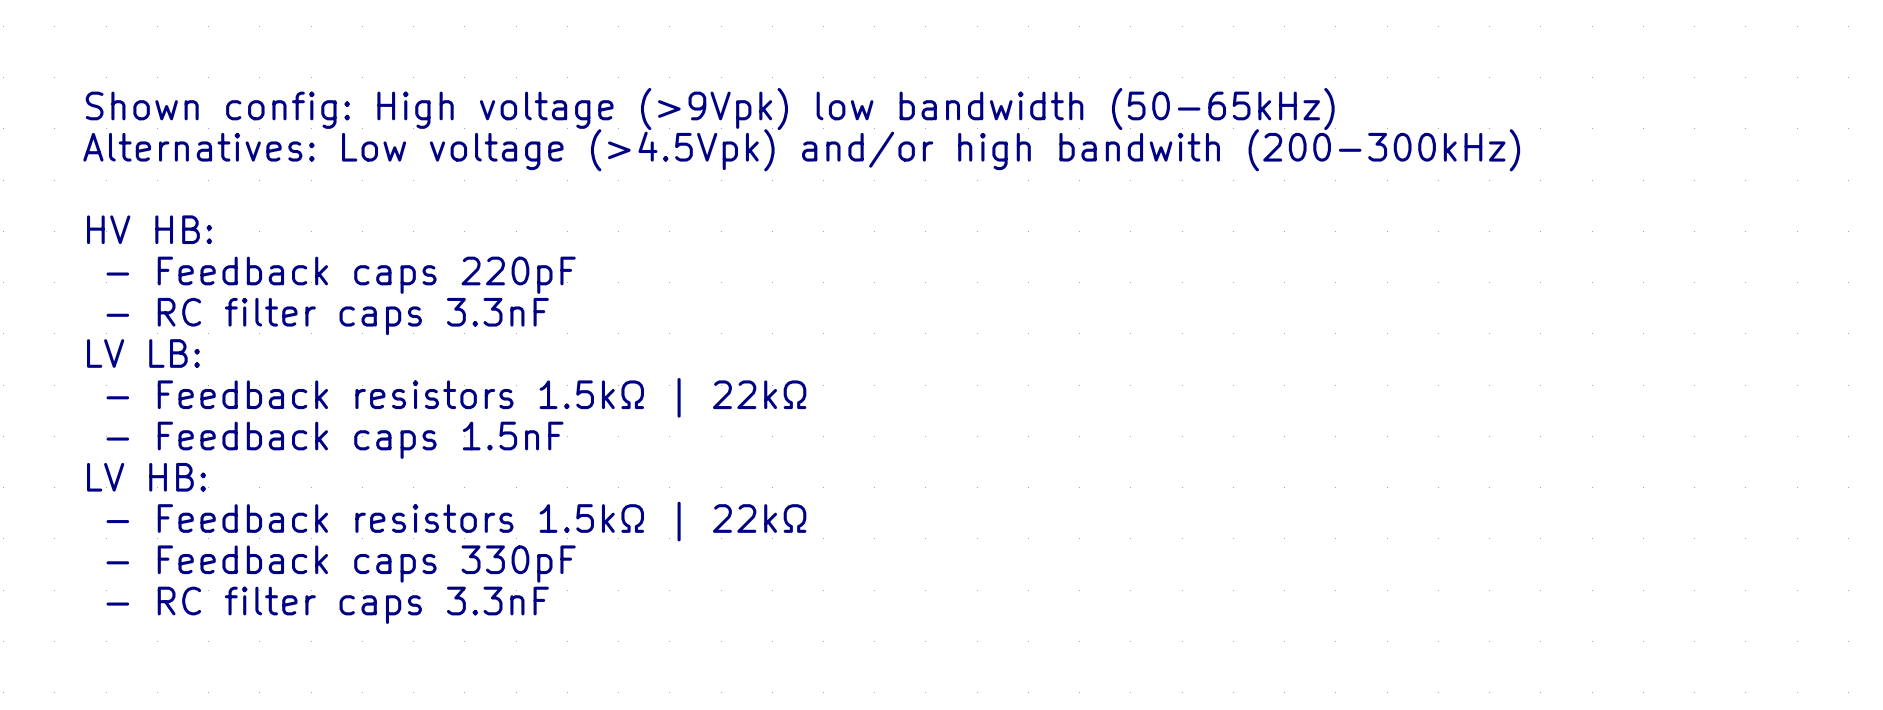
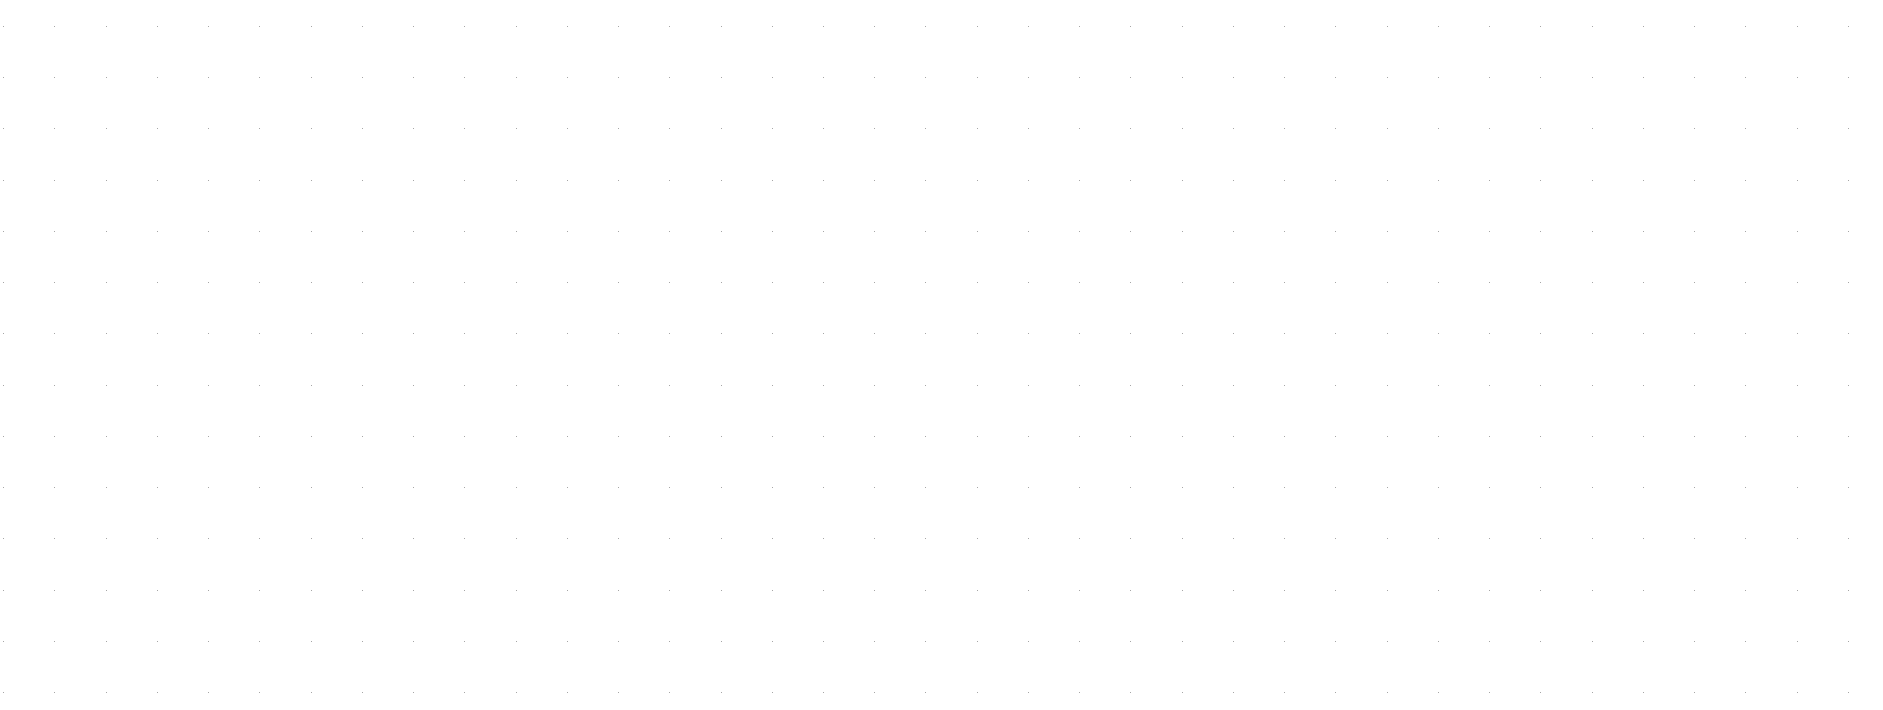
text: Shown config: High voltage (>9Vpk) low bandwidth (50-65kHz) (710, 109) -> none
text: Alternatives: Low voltage (>4.5Vpk) and/or high bandwith (200-300kHz) (801, 150) -> none
text: HV HB: (149, 229) -> none
text: - Feedback caps 220pF (341, 275) -> none
text: - RC filter caps 3.3nF (327, 316) -> none
text: LV LB: (143, 353) -> none
text: - Feedback resistors 1.5kΩ | 22kΩ (456, 397) -> none
text: - Feedback caps 1.5nF (335, 440) -> none
text: LV HB: (146, 477) -> none
text: - Feedback resistors 1.5kΩ | 22kΩ (456, 521) -> none
text: - Feedback caps 330pF (341, 564) -> none
text: - RC filter caps 3.3nF (327, 605) -> none

